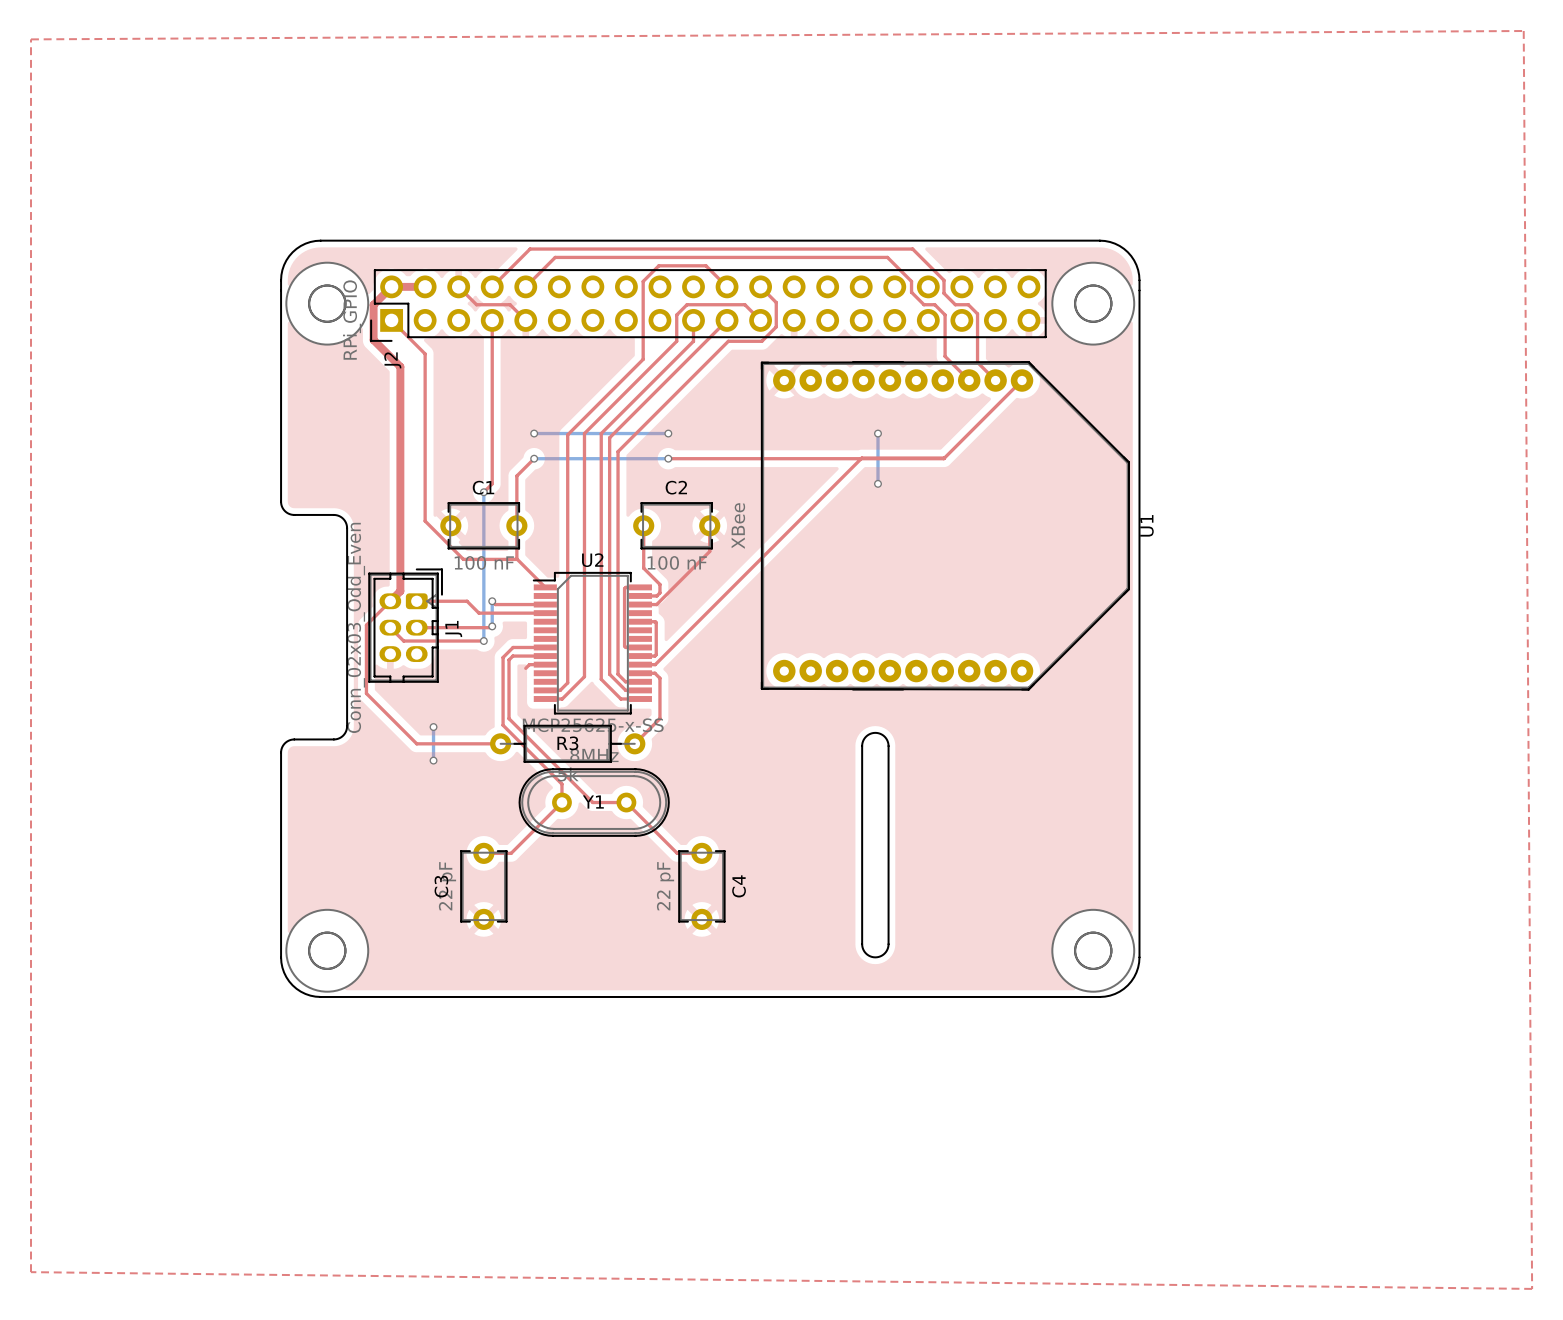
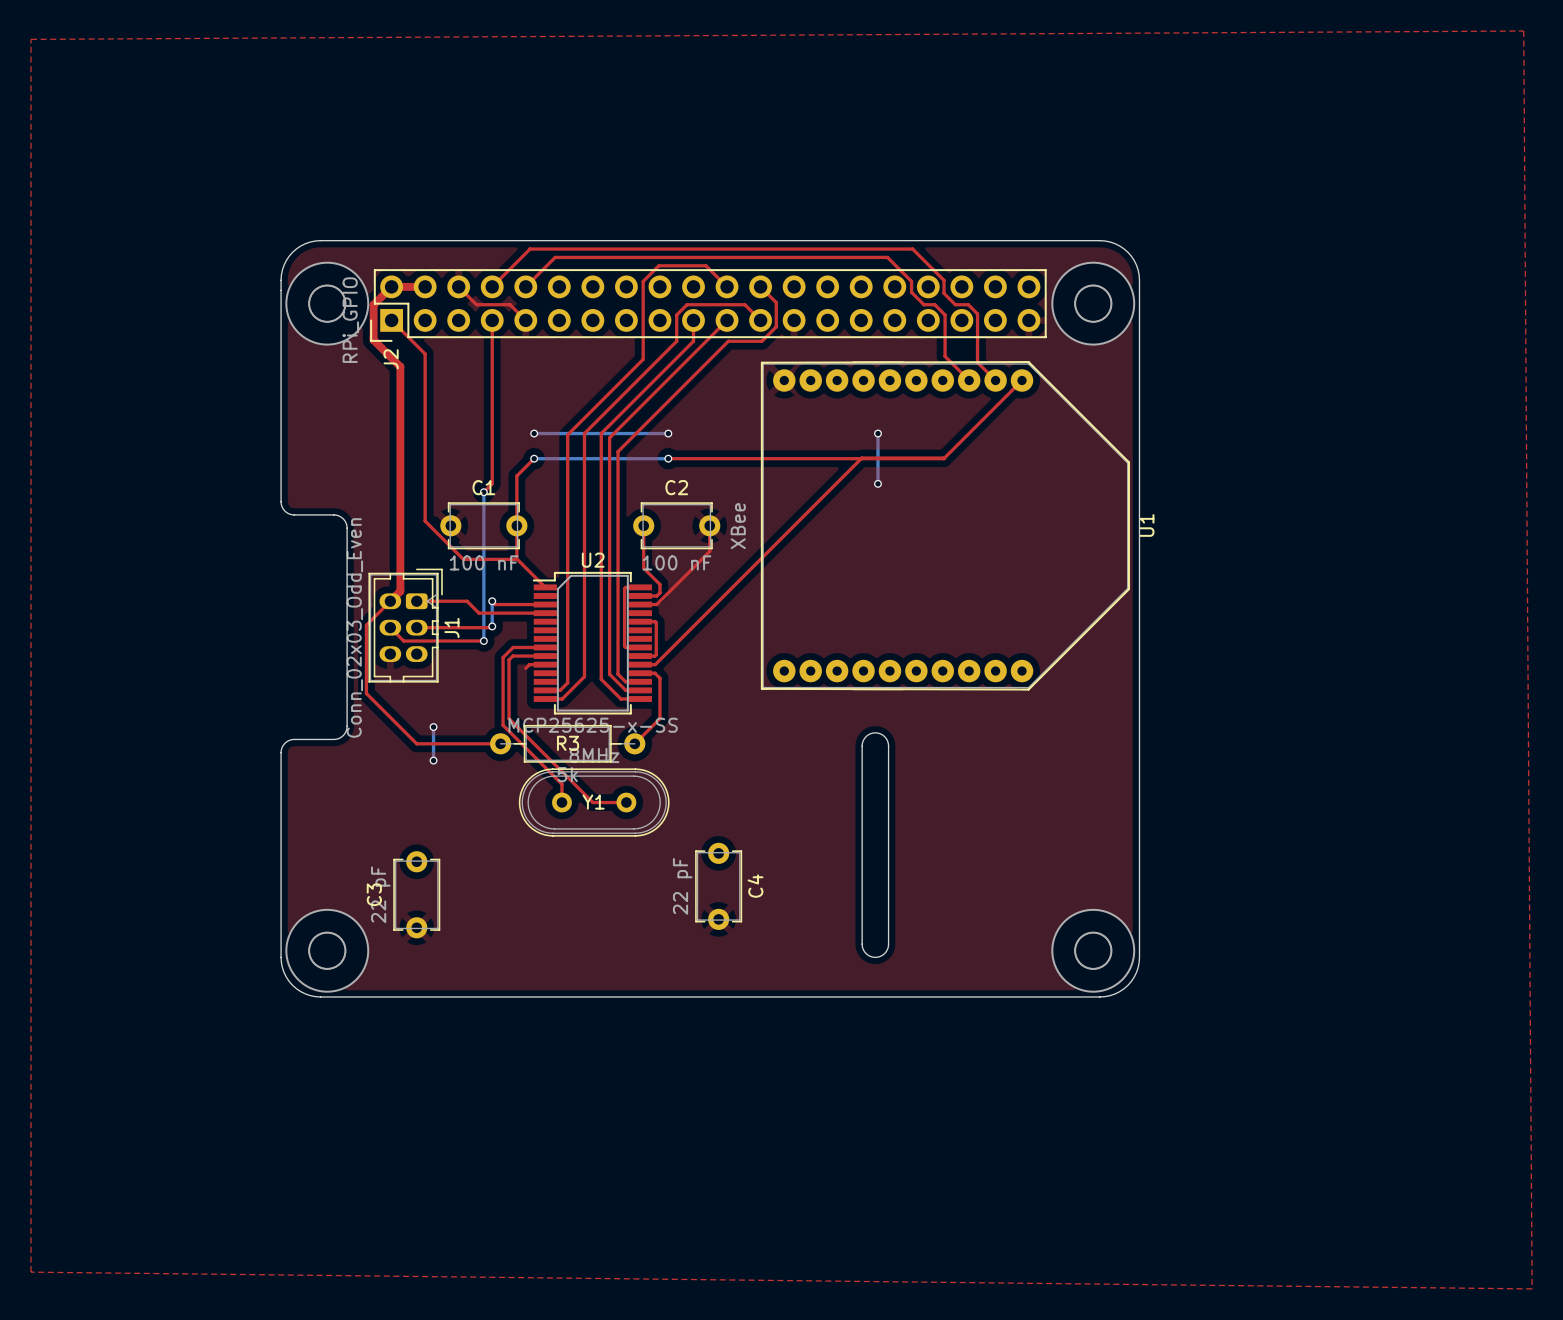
top track: (561, 802) (511, 853) (483, 853) -> none
top track: (626, 802) (677, 853) (701, 853) -> none
C3 position: (483, 886) -> (416, 894)
C4 position: (701, 886) -> (718, 886)

